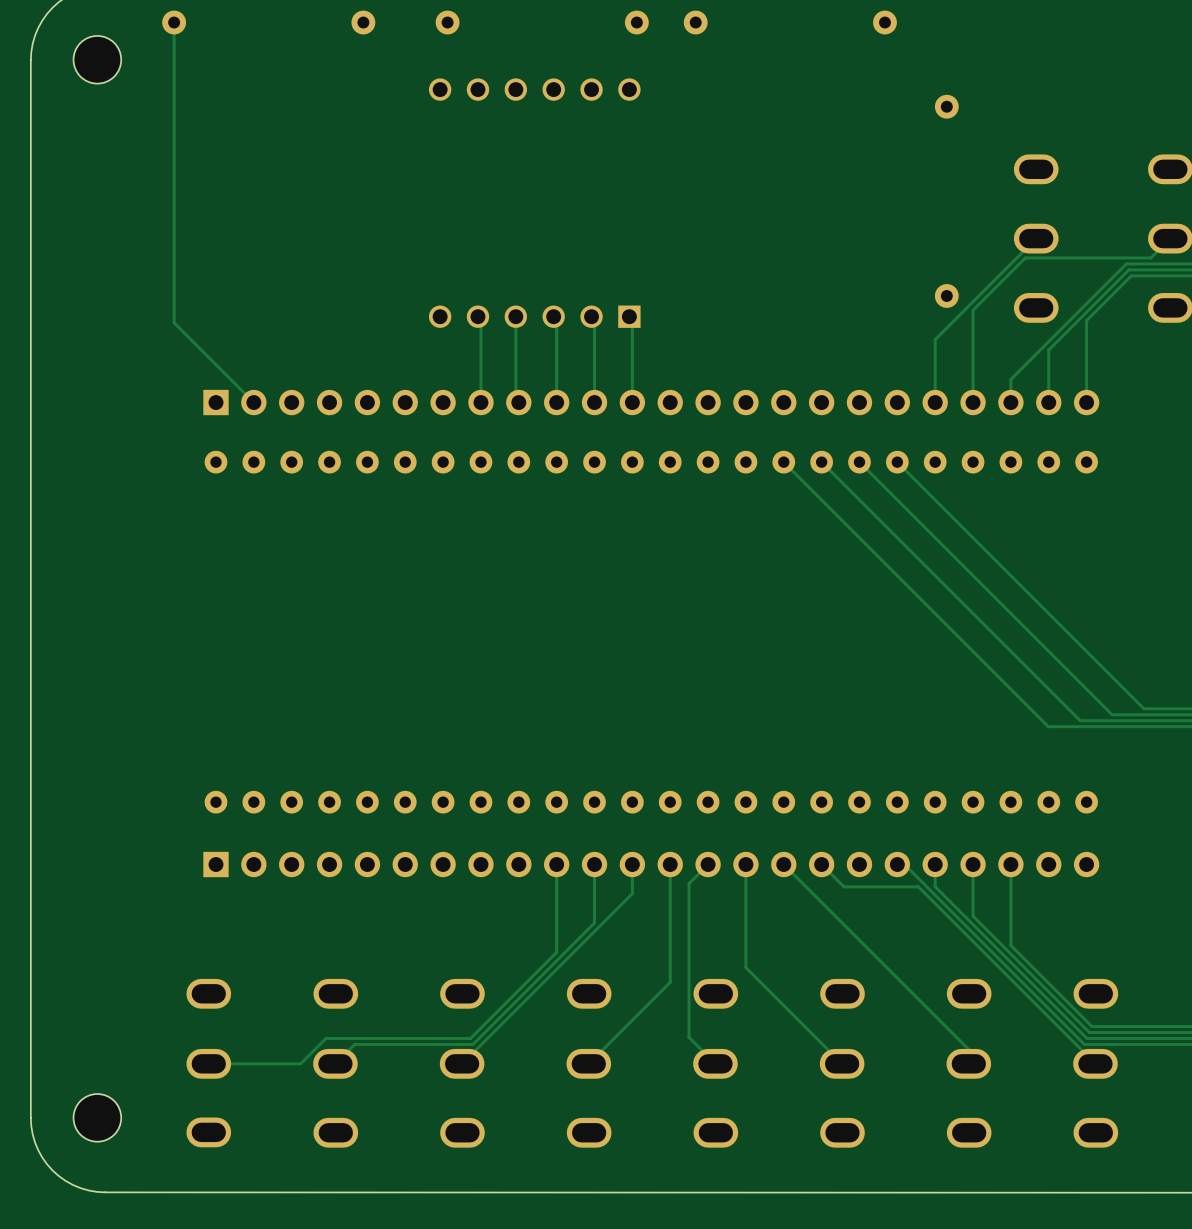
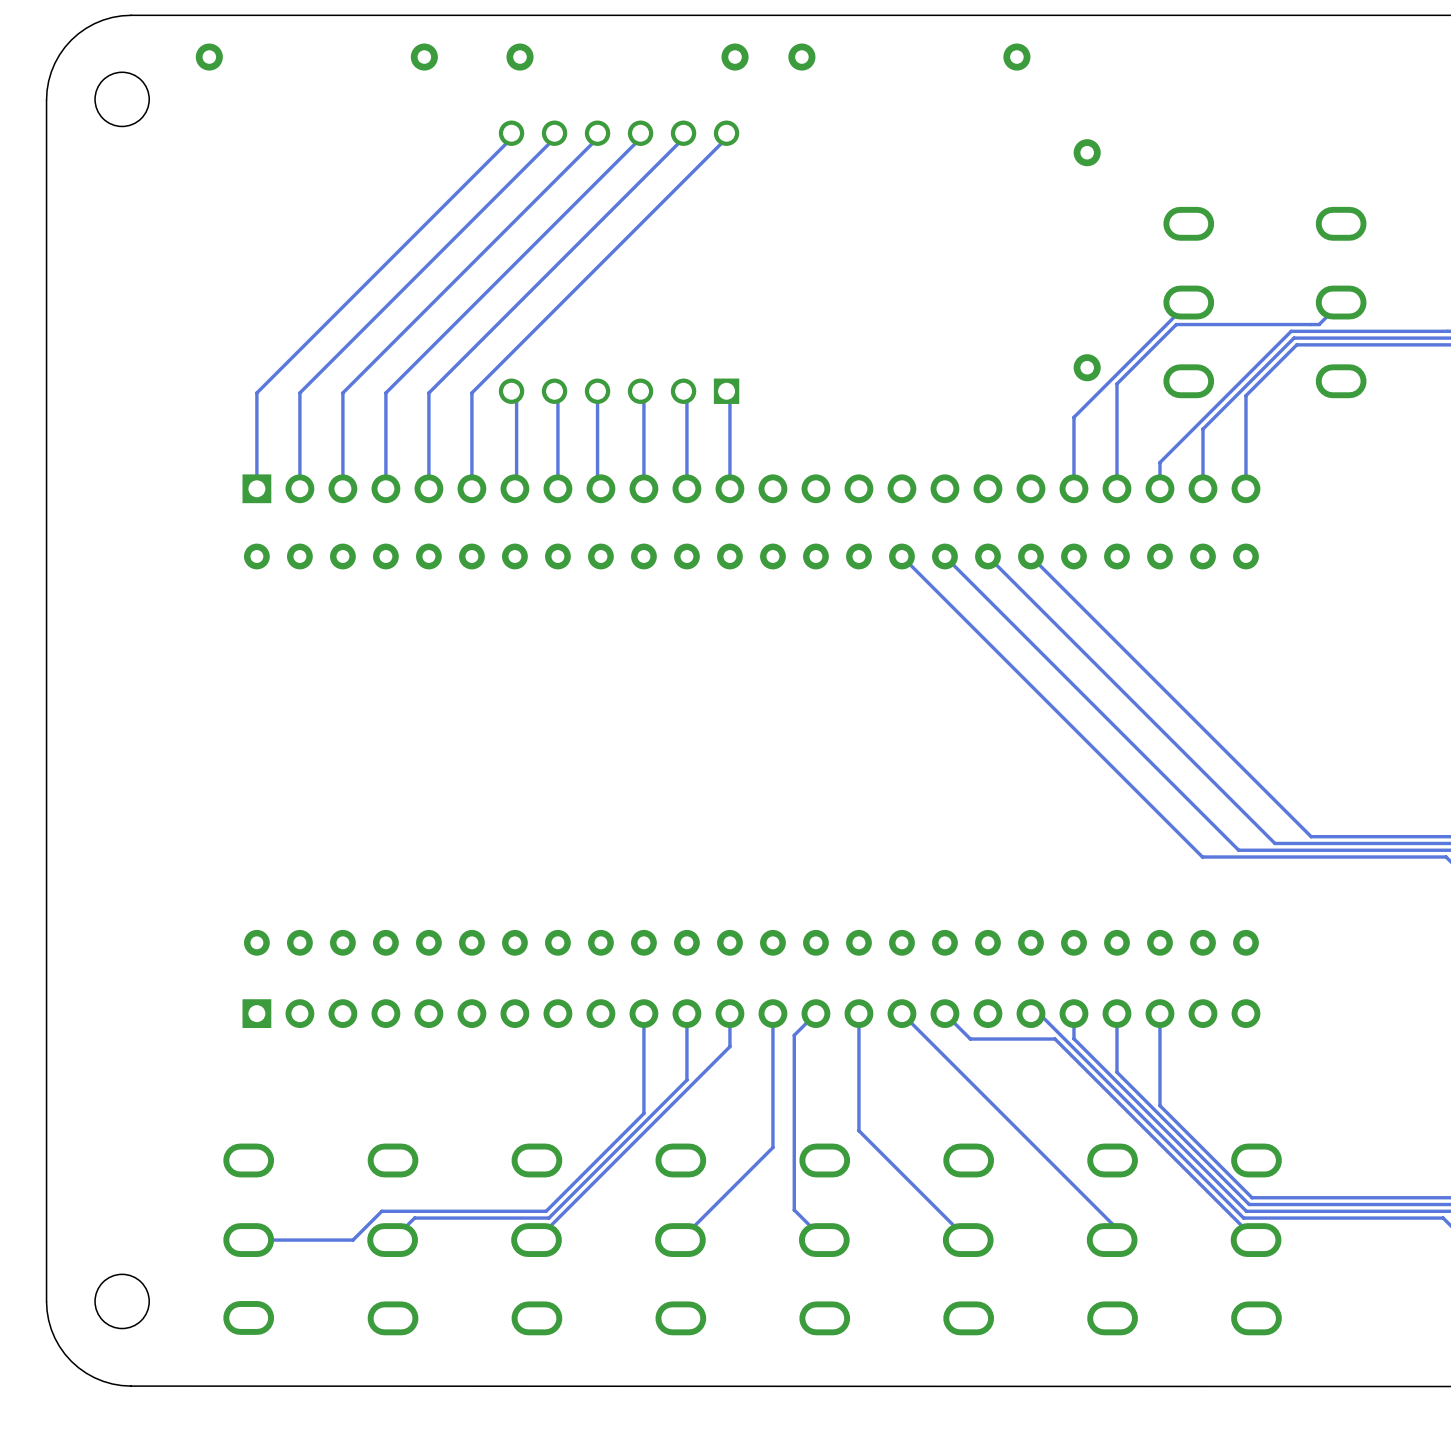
track: (174, 22) (174, 322) (253, 402) -> (559, 133) (299, 392) (299, 488)
track: none -> (516, 133) (256, 392) (256, 488)
track: none -> (602, 133) (342, 392) (342, 488)
track: none -> (645, 133) (385, 392) (385, 488)
track: none -> (688, 133) (428, 392) (428, 488)
track: none -> (731, 133) (471, 392) (471, 488)
track: none -> (516, 391) (516, 487) (514, 488)

